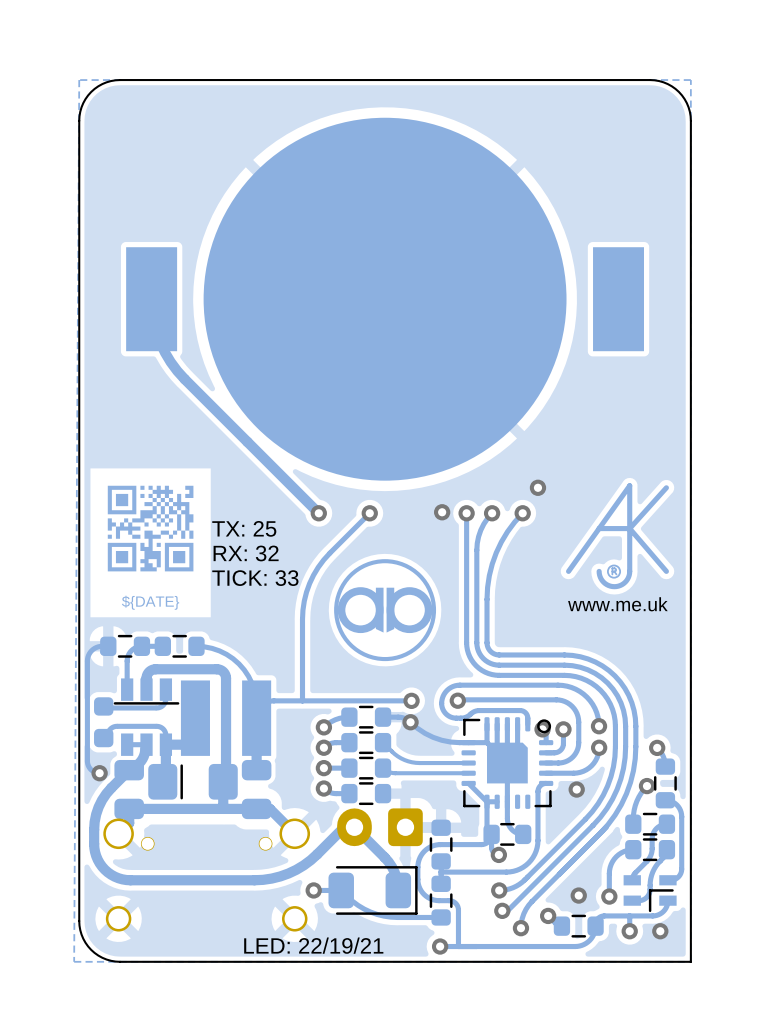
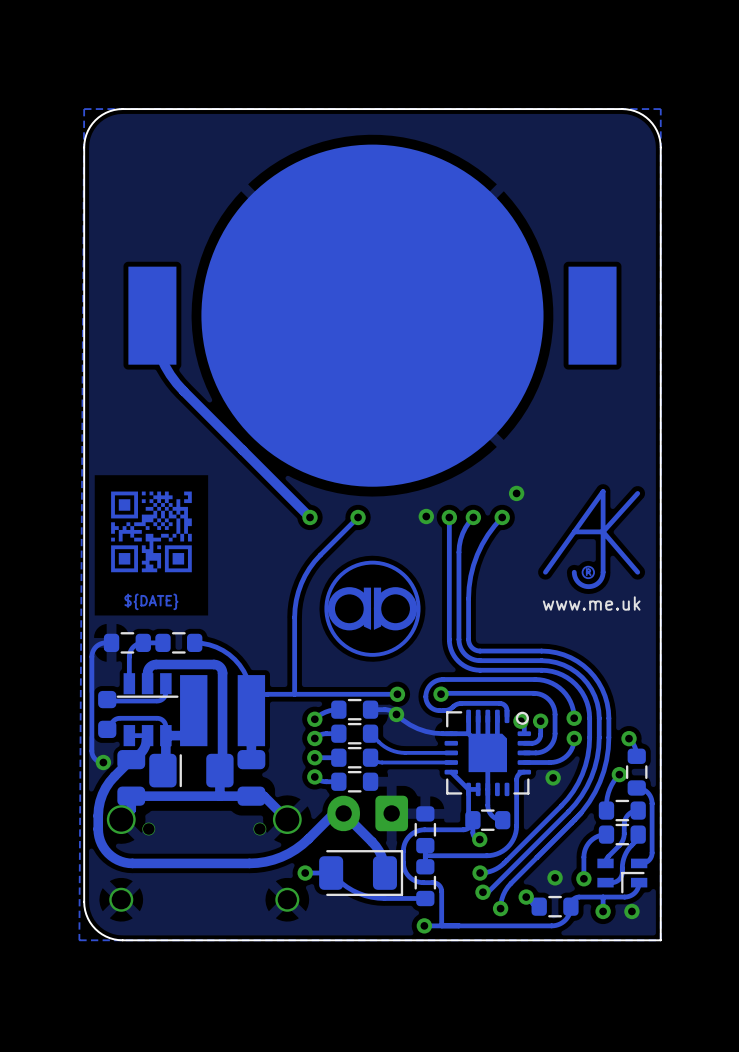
text: TX: 25 (244, 528) -> none
text: RX: 32 (246, 553) -> none
text: TICK: 33 (255, 578) -> none
text: LED: 22/19/21 (313, 945) -> none

